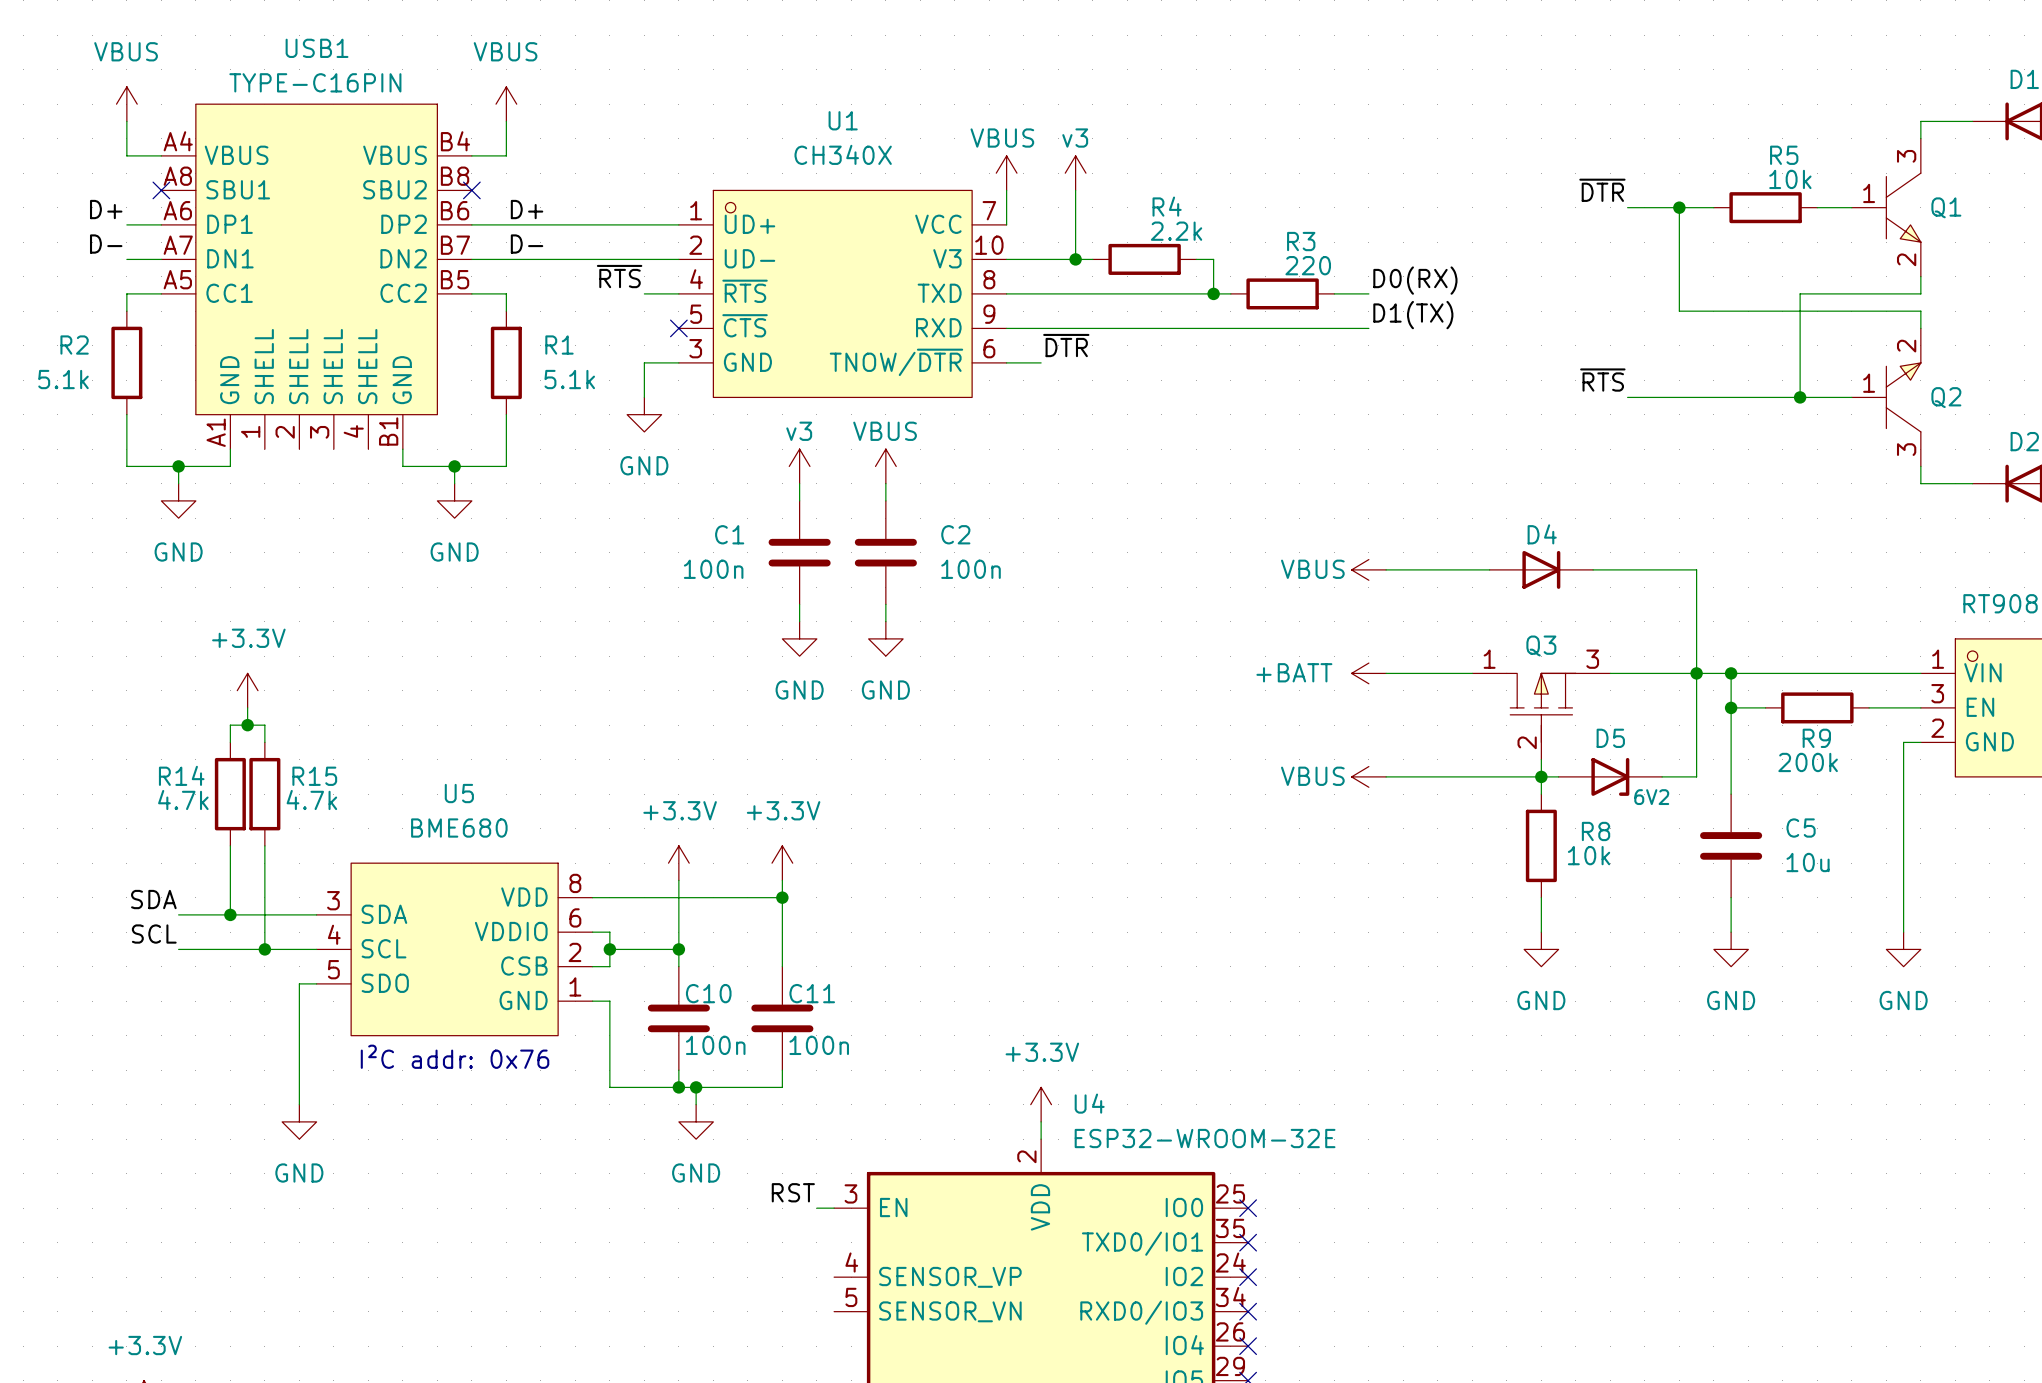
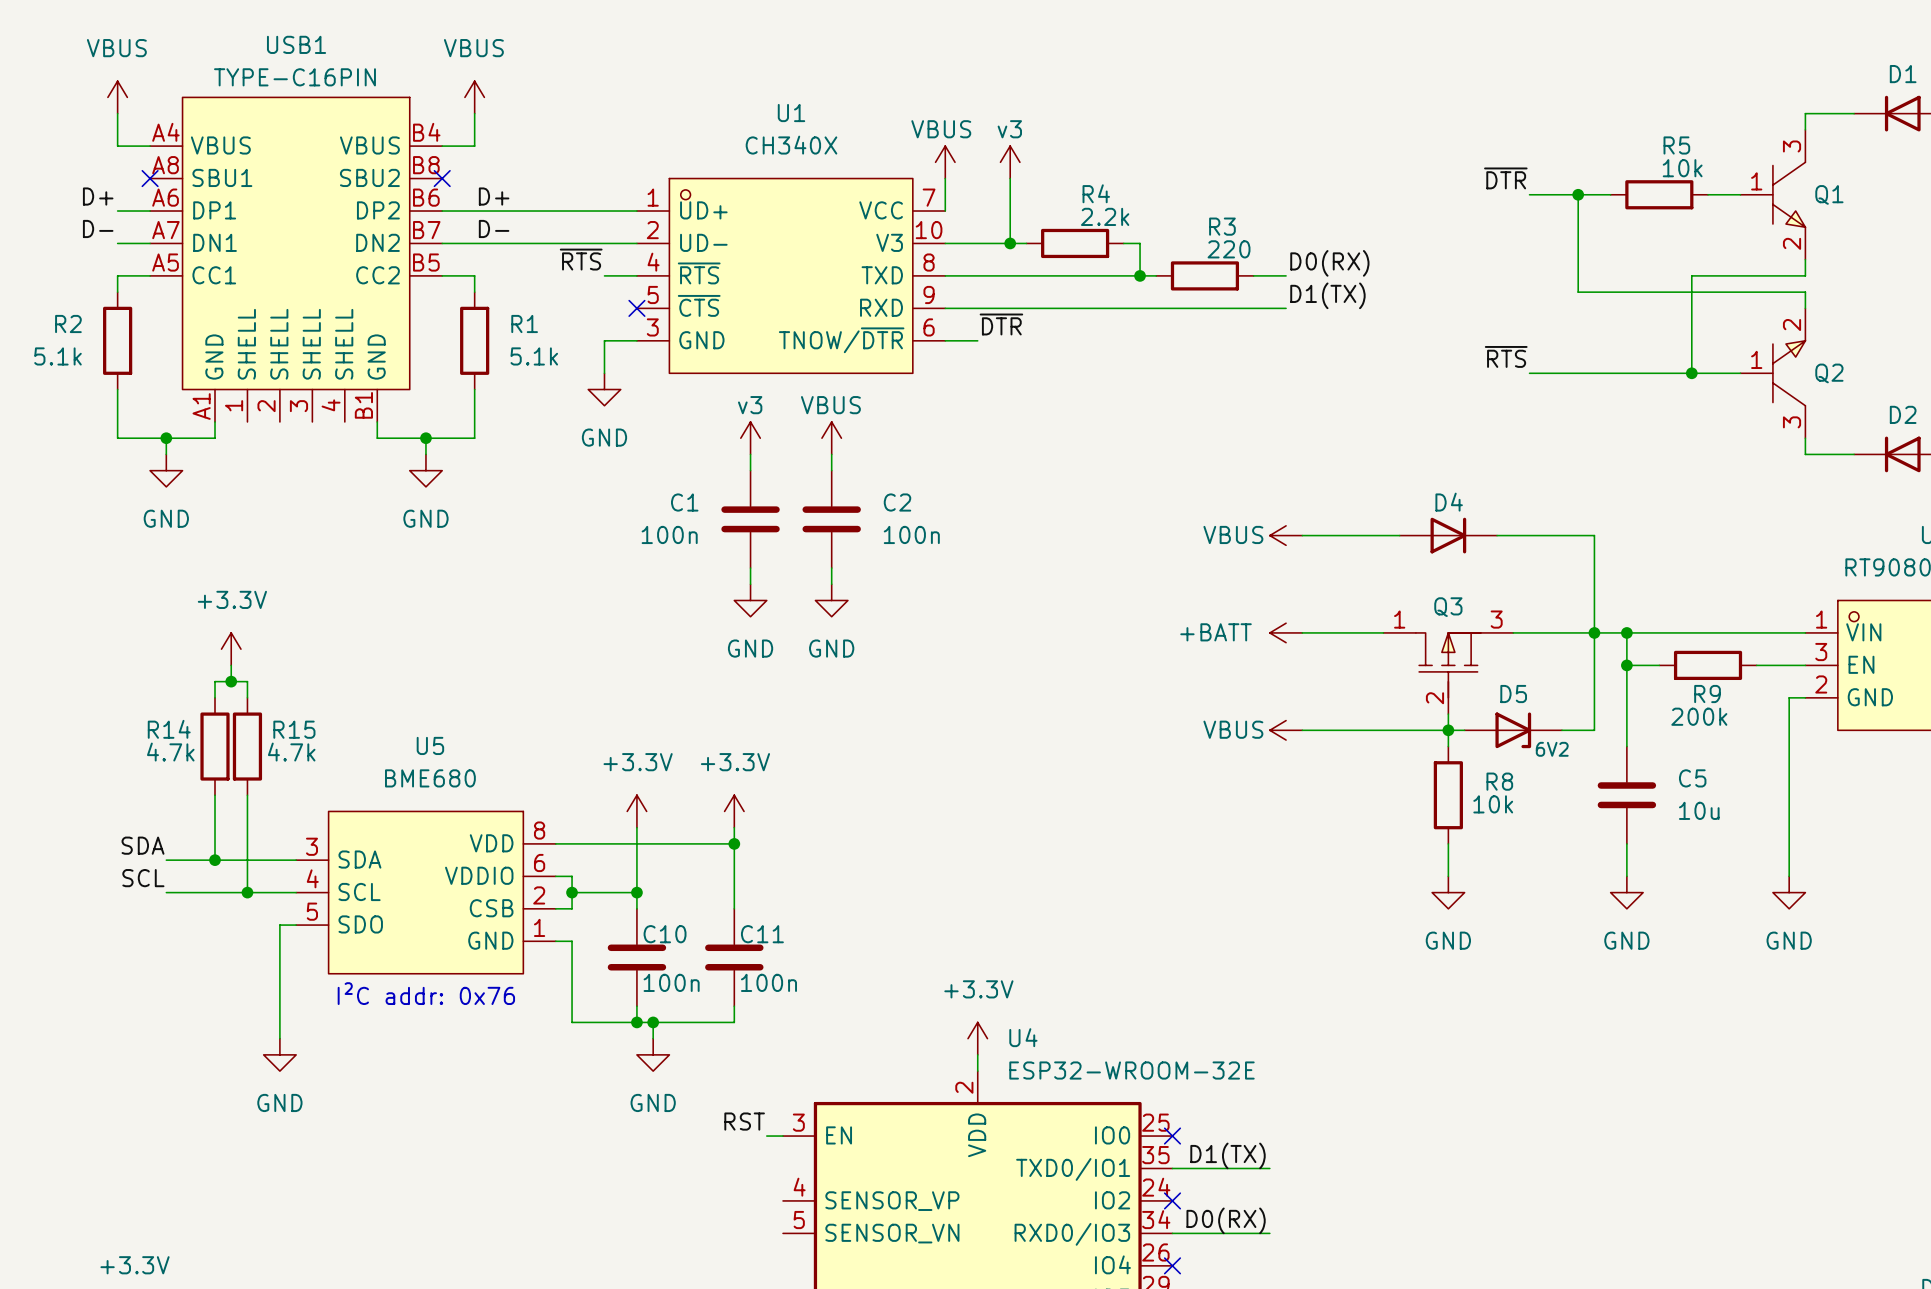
label: none -> D1(TX) (1228, 1155)
wire: none -> (1172, 1168) (1269, 1168)
no-connect mark: (1248, 1242) -> none
label: none -> D0(RX) (1226, 1220)
wire: none -> (1172, 1233) (1269, 1233)
no-connect mark: (1248, 1311) -> none

